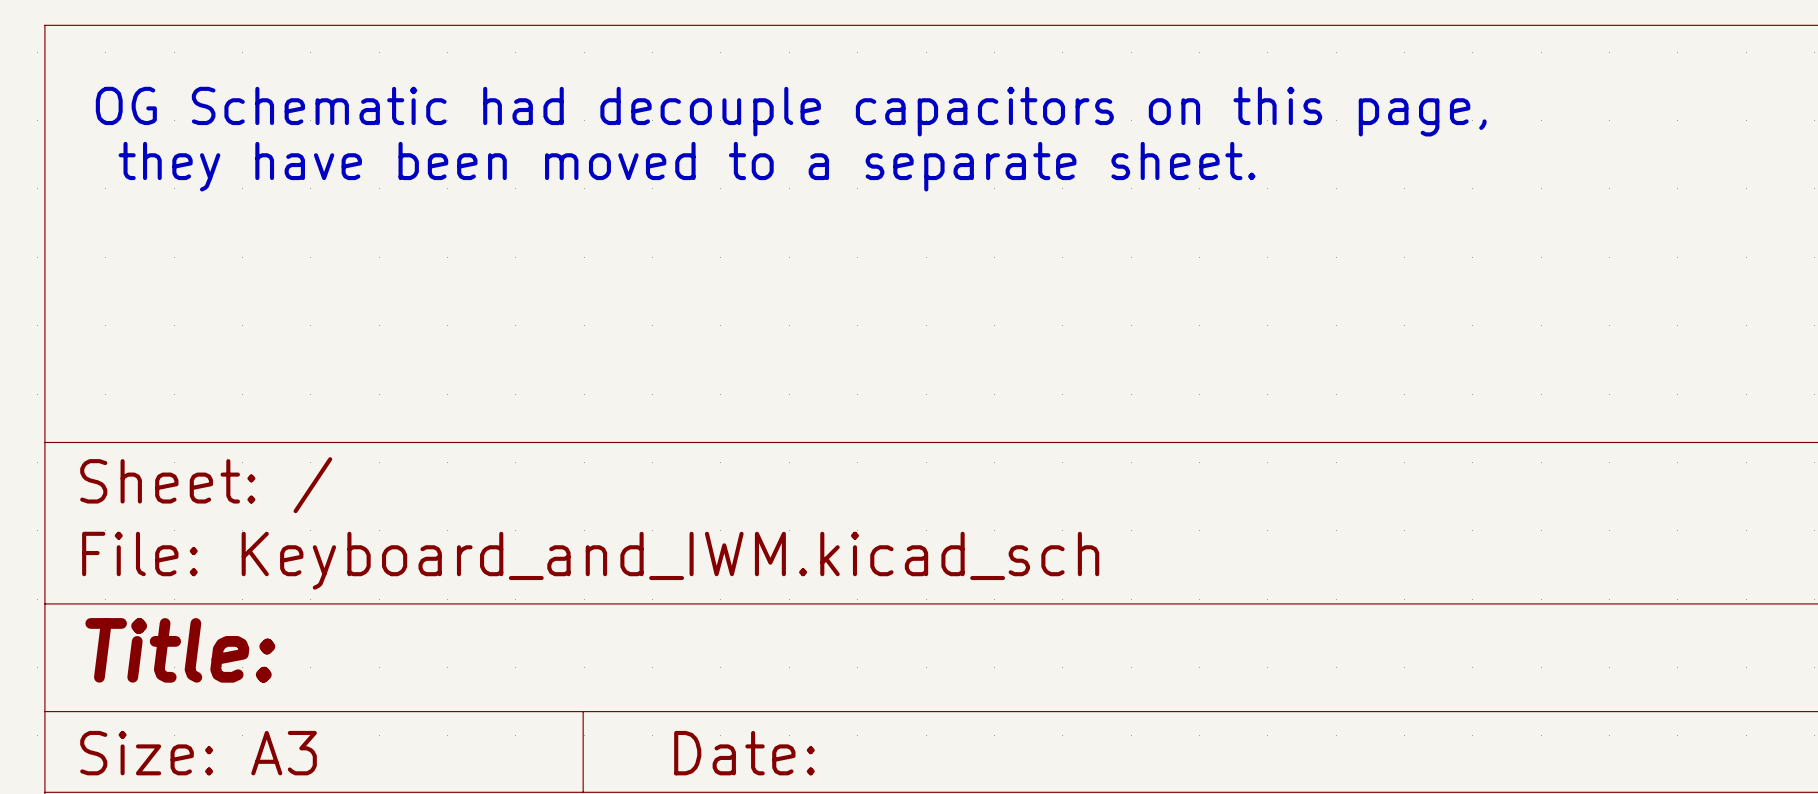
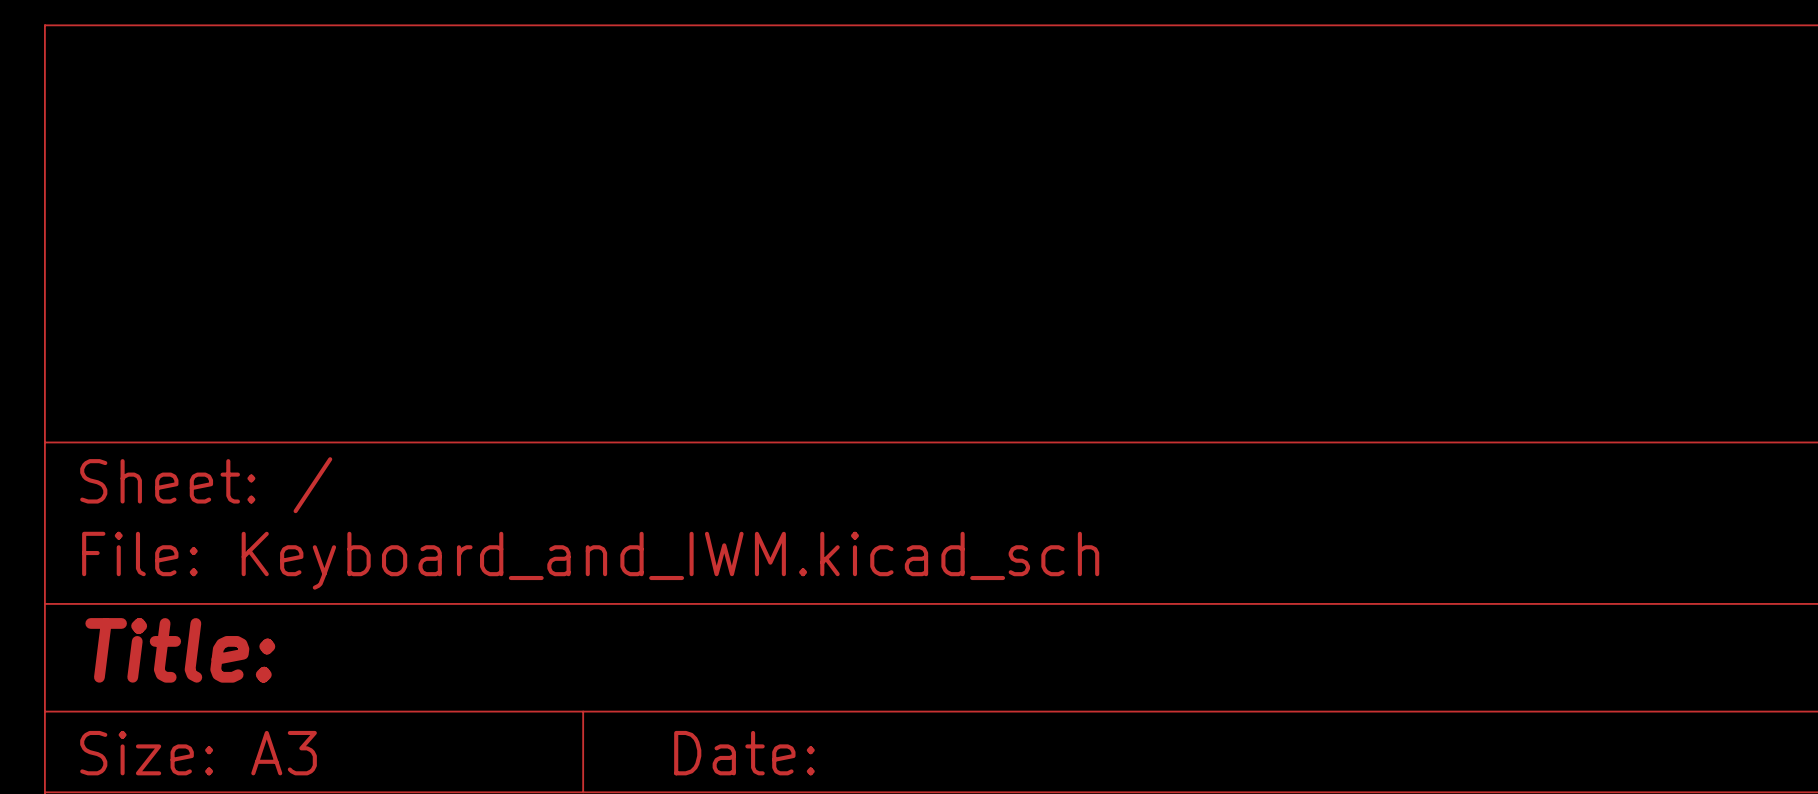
text: OG Schematic had decouple capacitors on this page, (791, 111) -> none
text: they have been moved to a separate sheet. (687, 166) -> none

